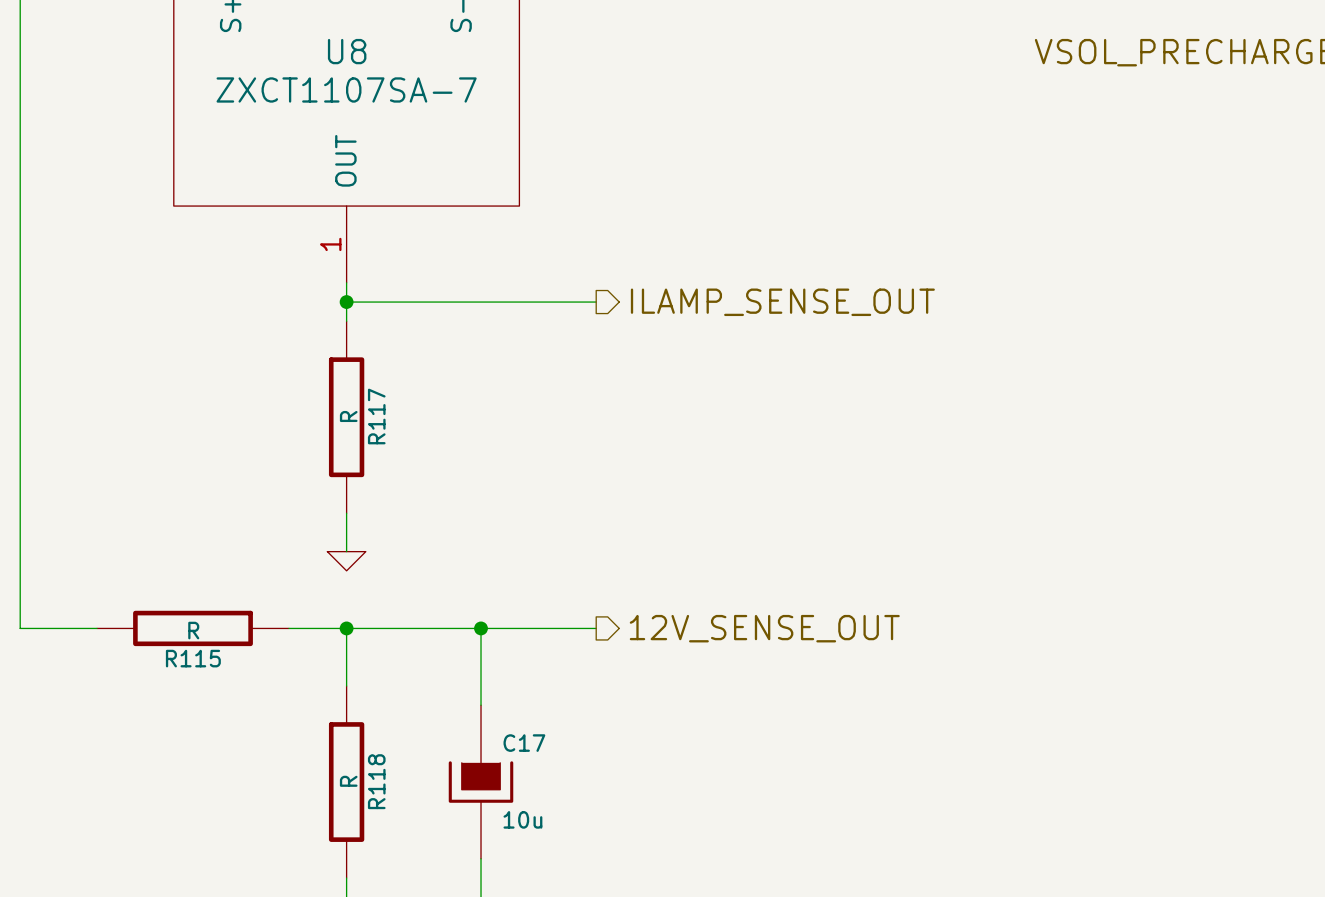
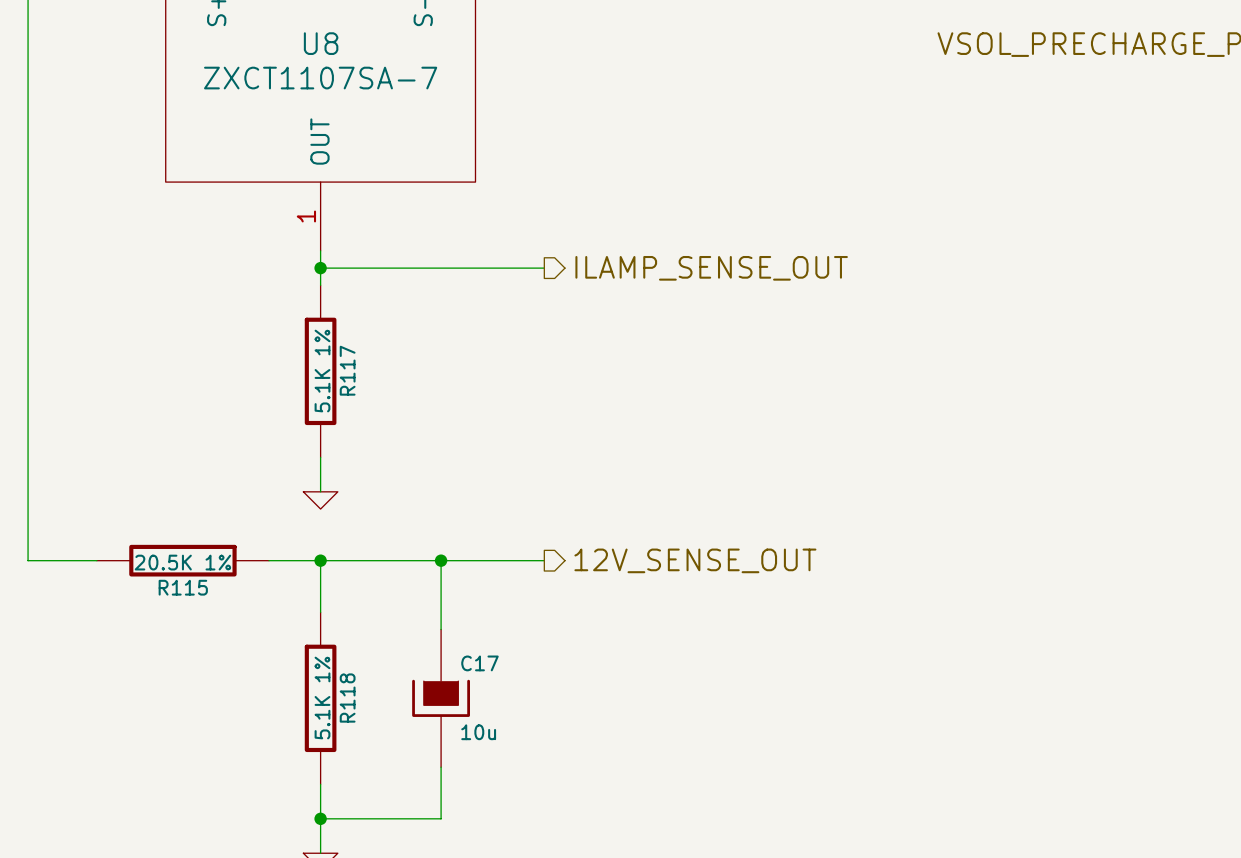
R117 value: R (348, 416) -> 5.1K 1% (322, 371)
R115 value: R (193, 630) -> 20.5K 1% (182, 562)
R118 value: R (348, 781) -> 5.1K 1% (322, 698)

